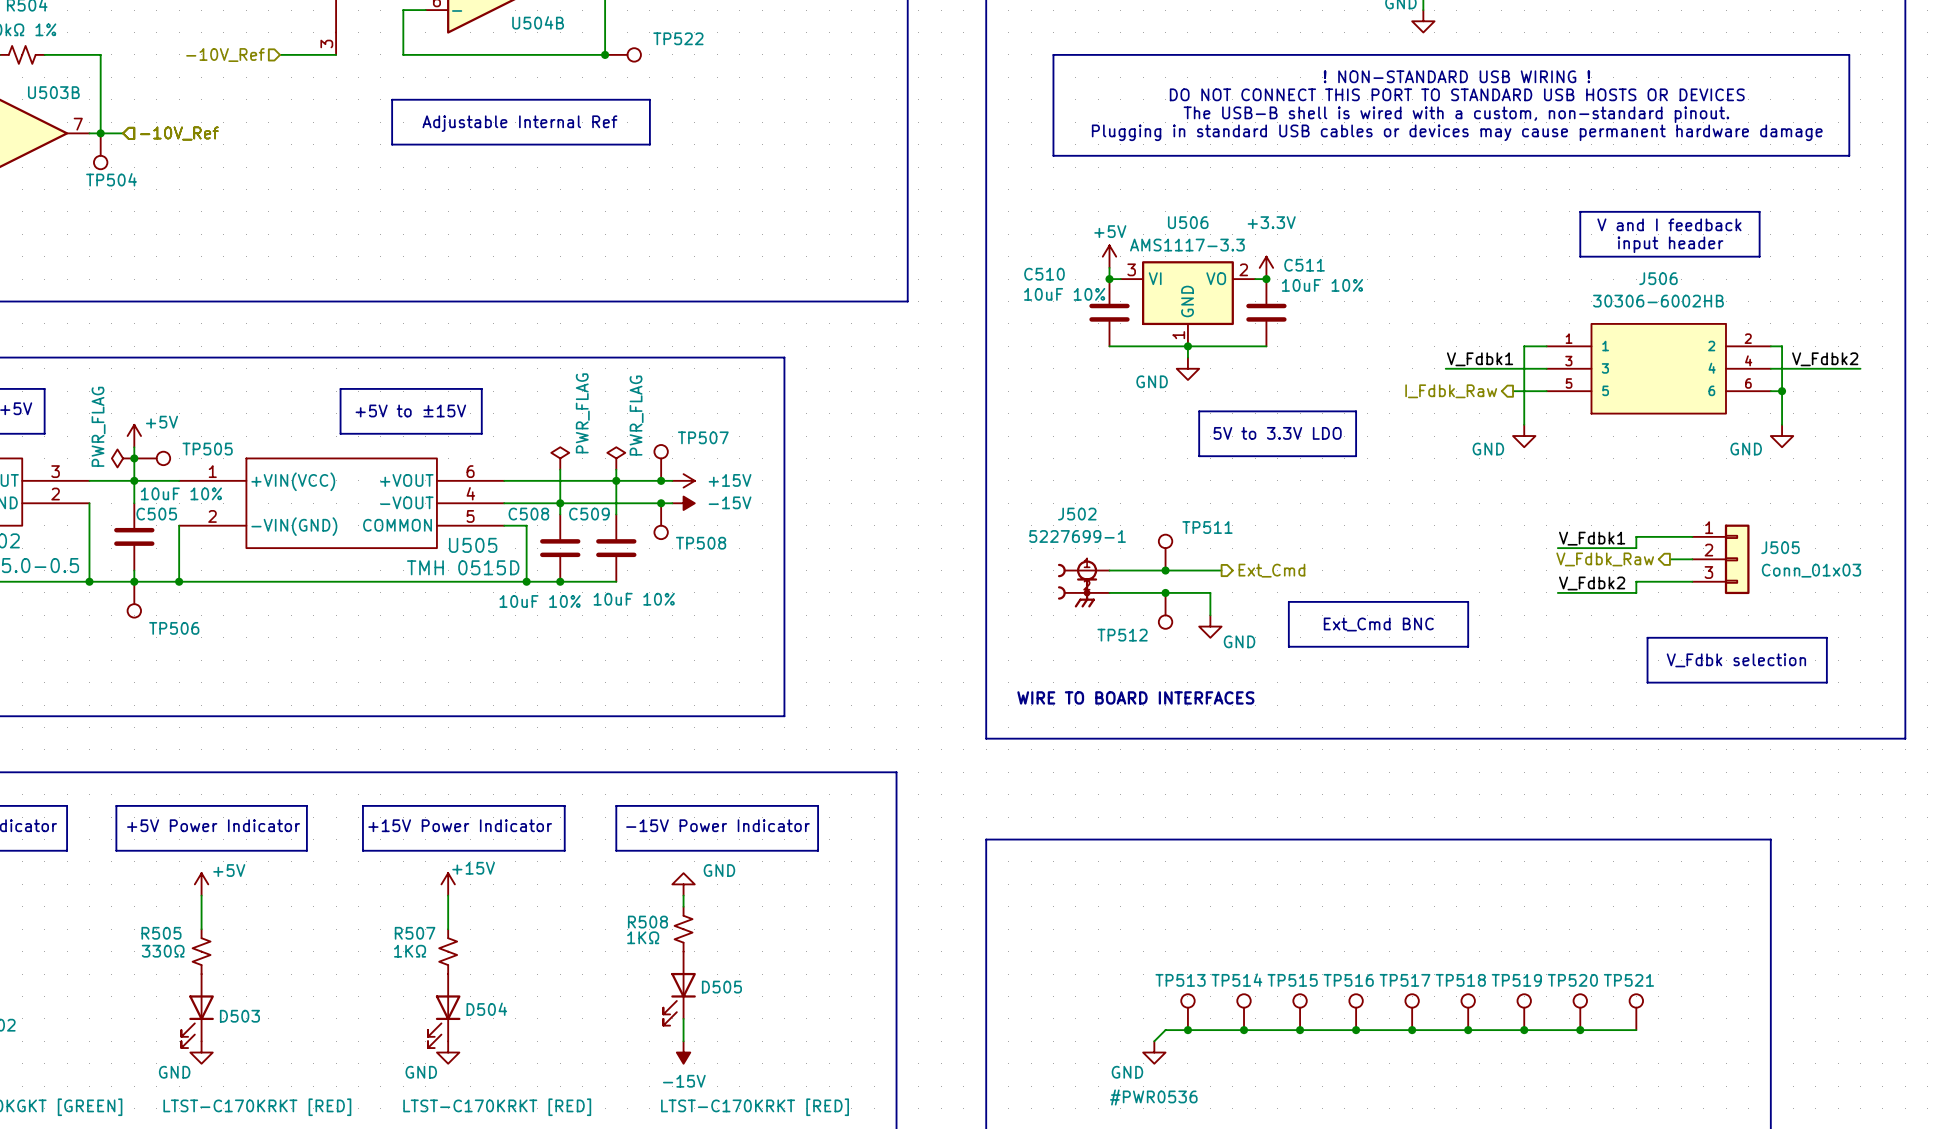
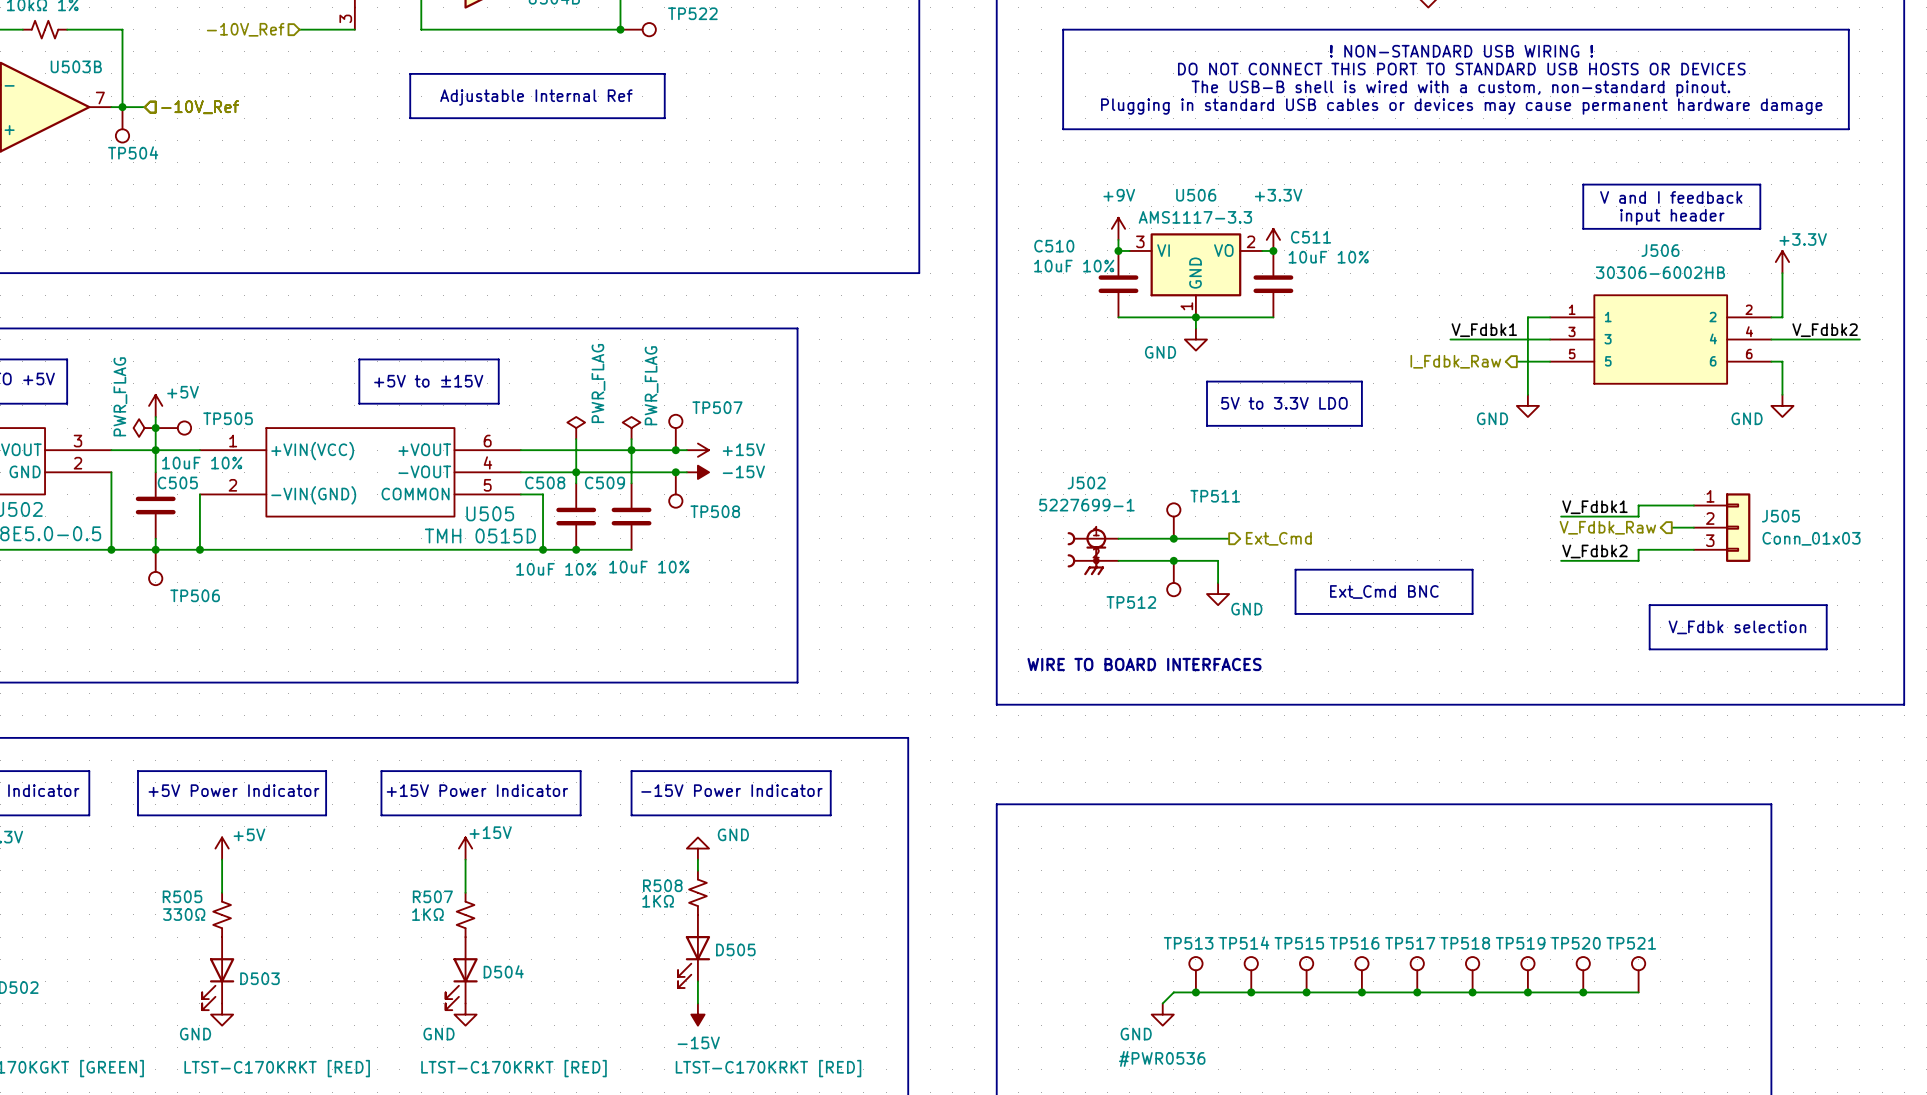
power symbol: +5V (1109, 256) -> +9V (1118, 228)
power symbol: none -> +3.3V (1782, 262)
wire: (1782, 346) (1782, 391) -> (1782, 317) (1782, 273)
junction: (1782, 391) -> none

